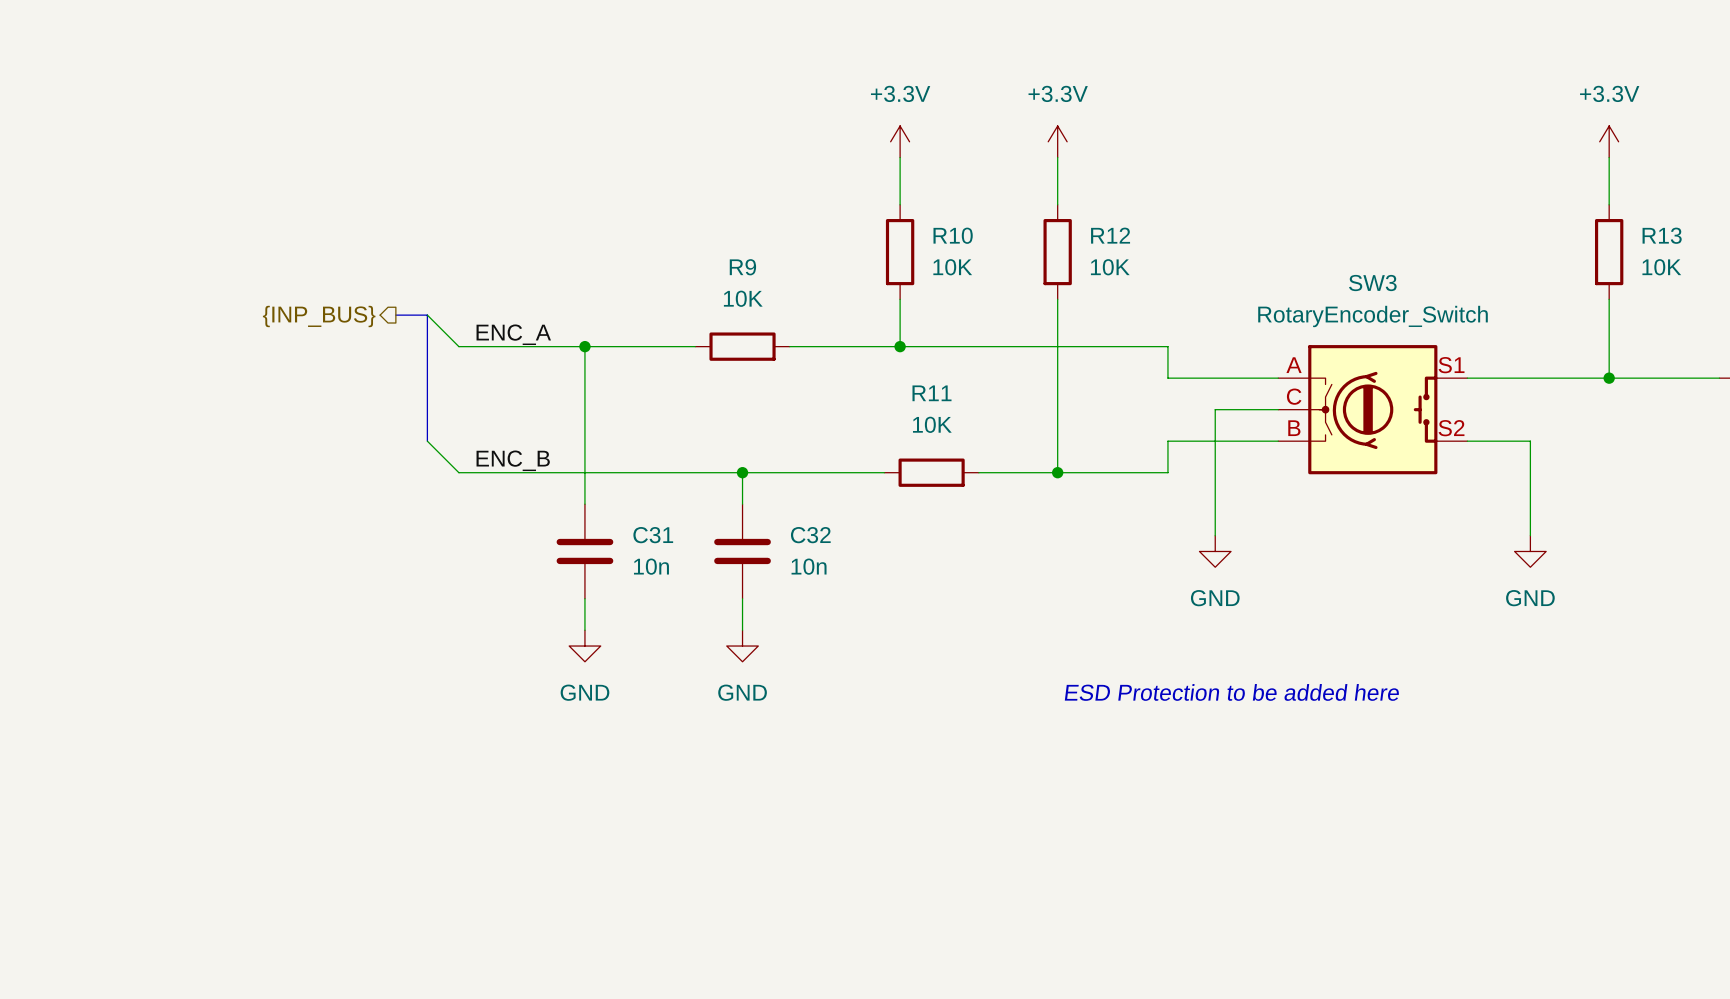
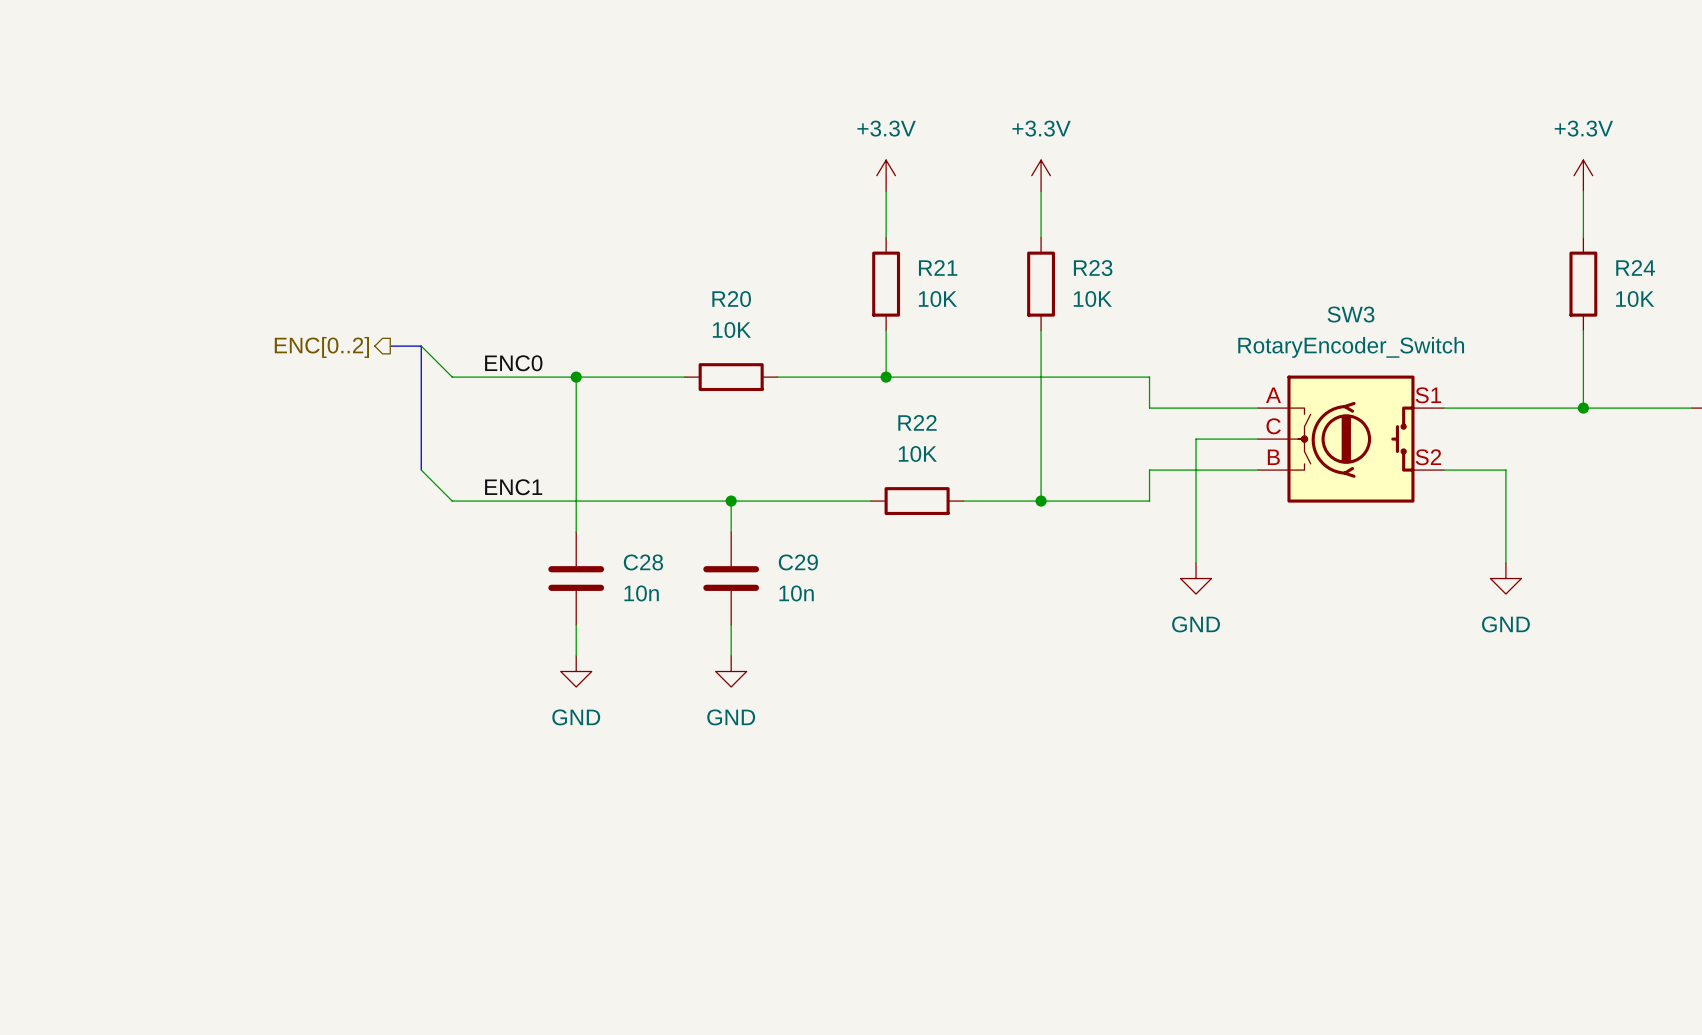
R10 name: R10 (953, 235) -> R21 (938, 267)
R12 name: R12 (1110, 235) -> R23 (1093, 268)
R13 name: R13 (1662, 235) -> R24 (1635, 267)
R9 name: R9 (742, 267) -> R20 (731, 299)
hierarchical label: {INP_BUS} (319, 316) -> ENC[0..2] (321, 347)
label: ENC_A (513, 334) -> ENC0 (513, 363)
R11 name: R11 (931, 393) -> R22 (917, 422)
label: ENC_B (513, 460) -> ENC1 (513, 487)
C31 name: C31 (653, 535) -> C28 (643, 562)
C32 name: C32 (810, 535) -> C29 (798, 562)
text: ESD Protection to be added here (1232, 692) -> none

